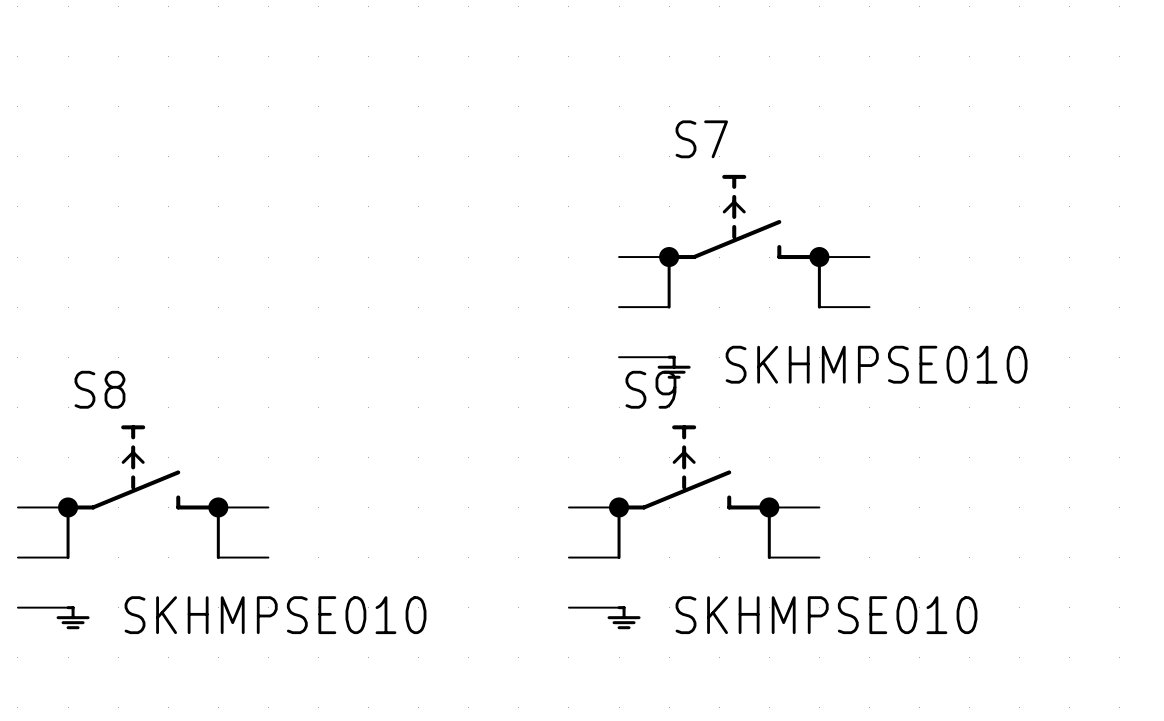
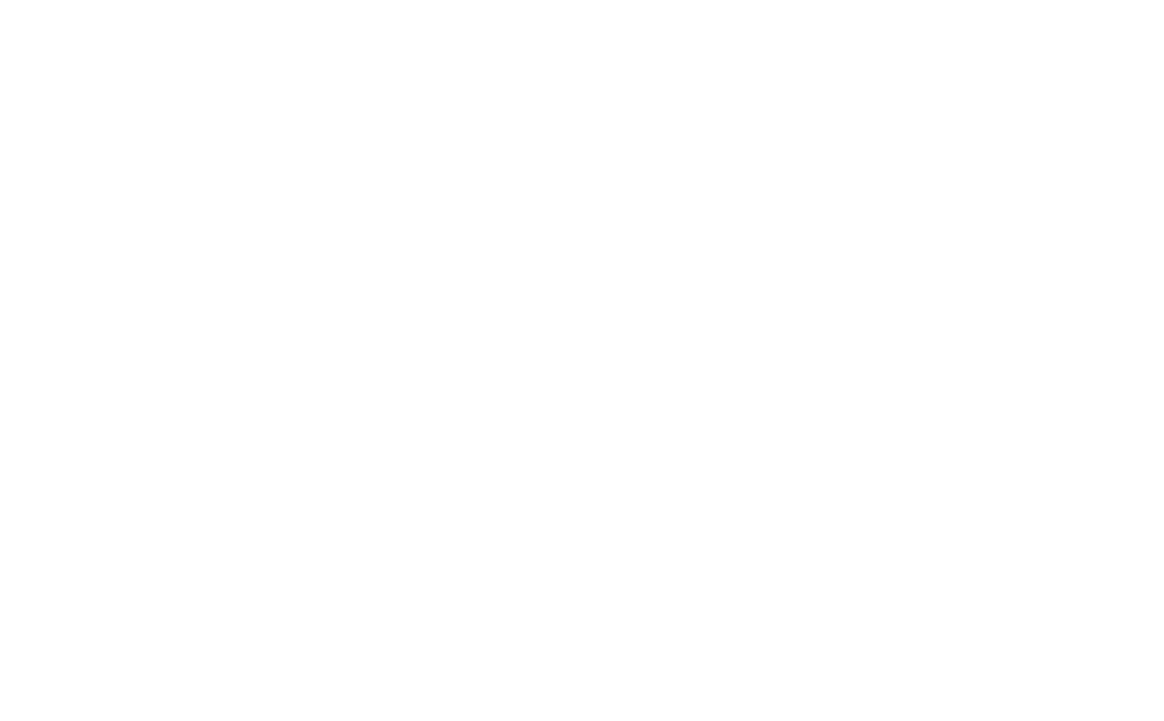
S7: SKHMPSE010 (744, 276) -> none
S8: SKHMPSE010 (143, 527) -> none
S9: SKHMPSE010 (694, 527) -> none

